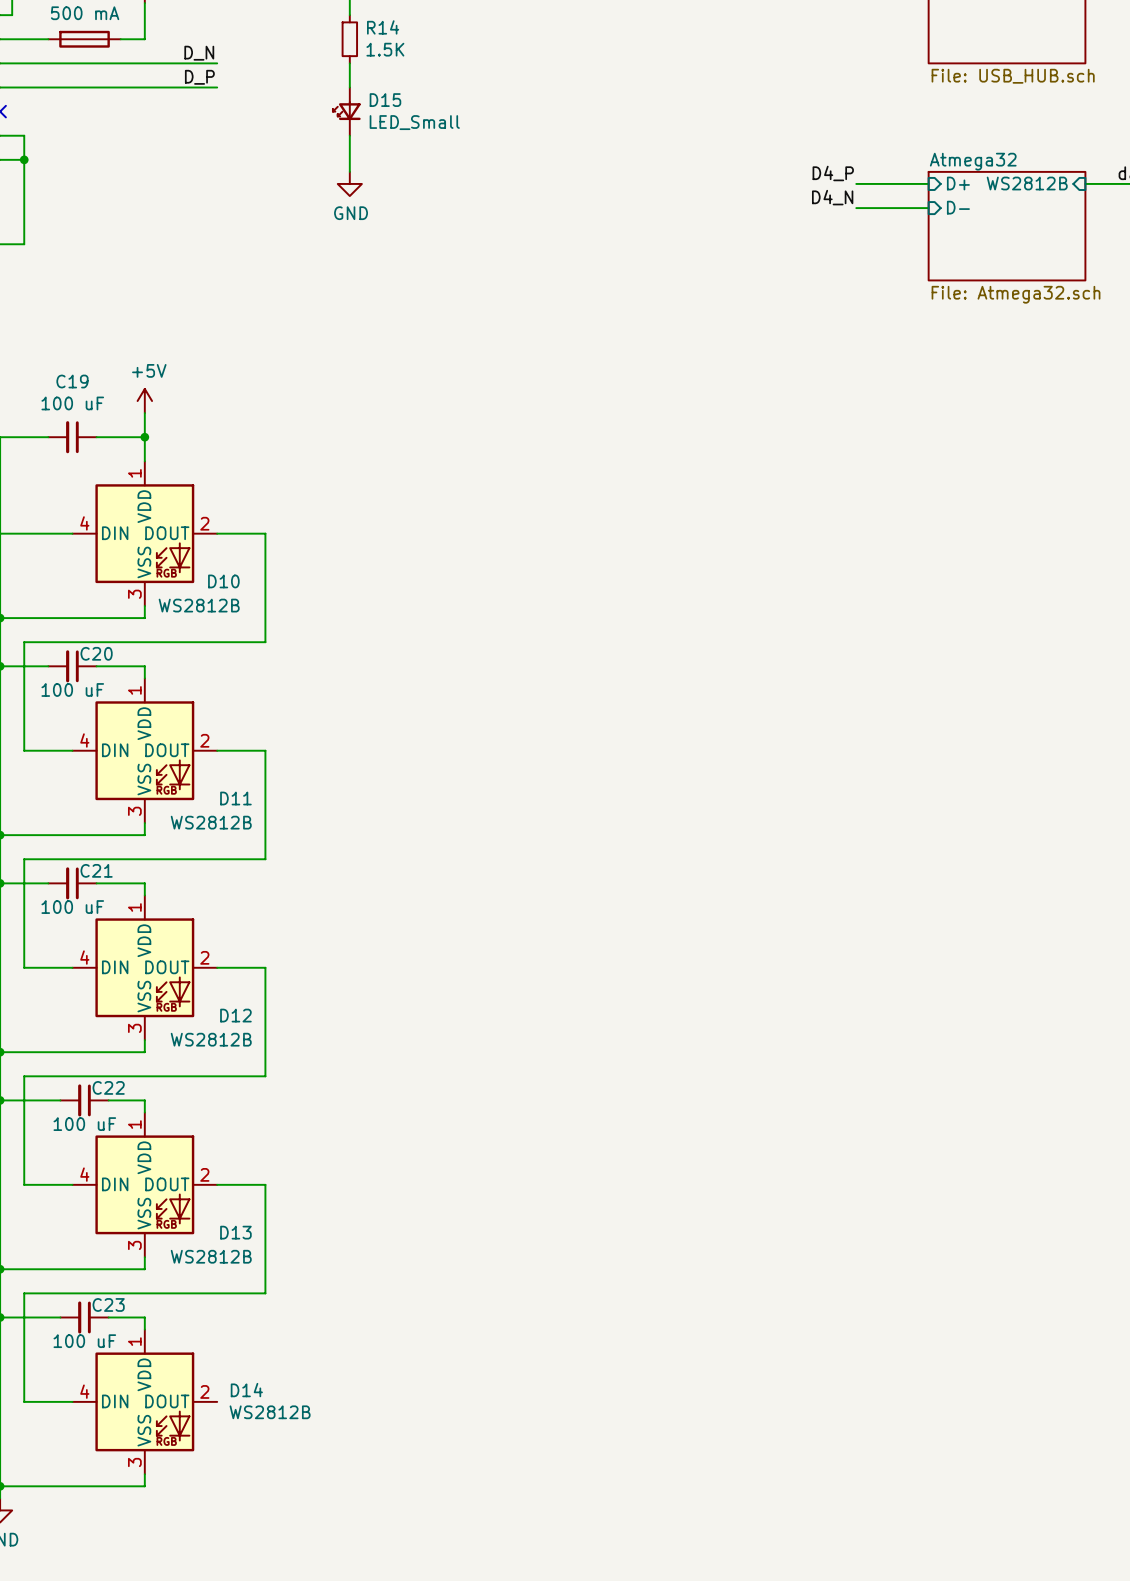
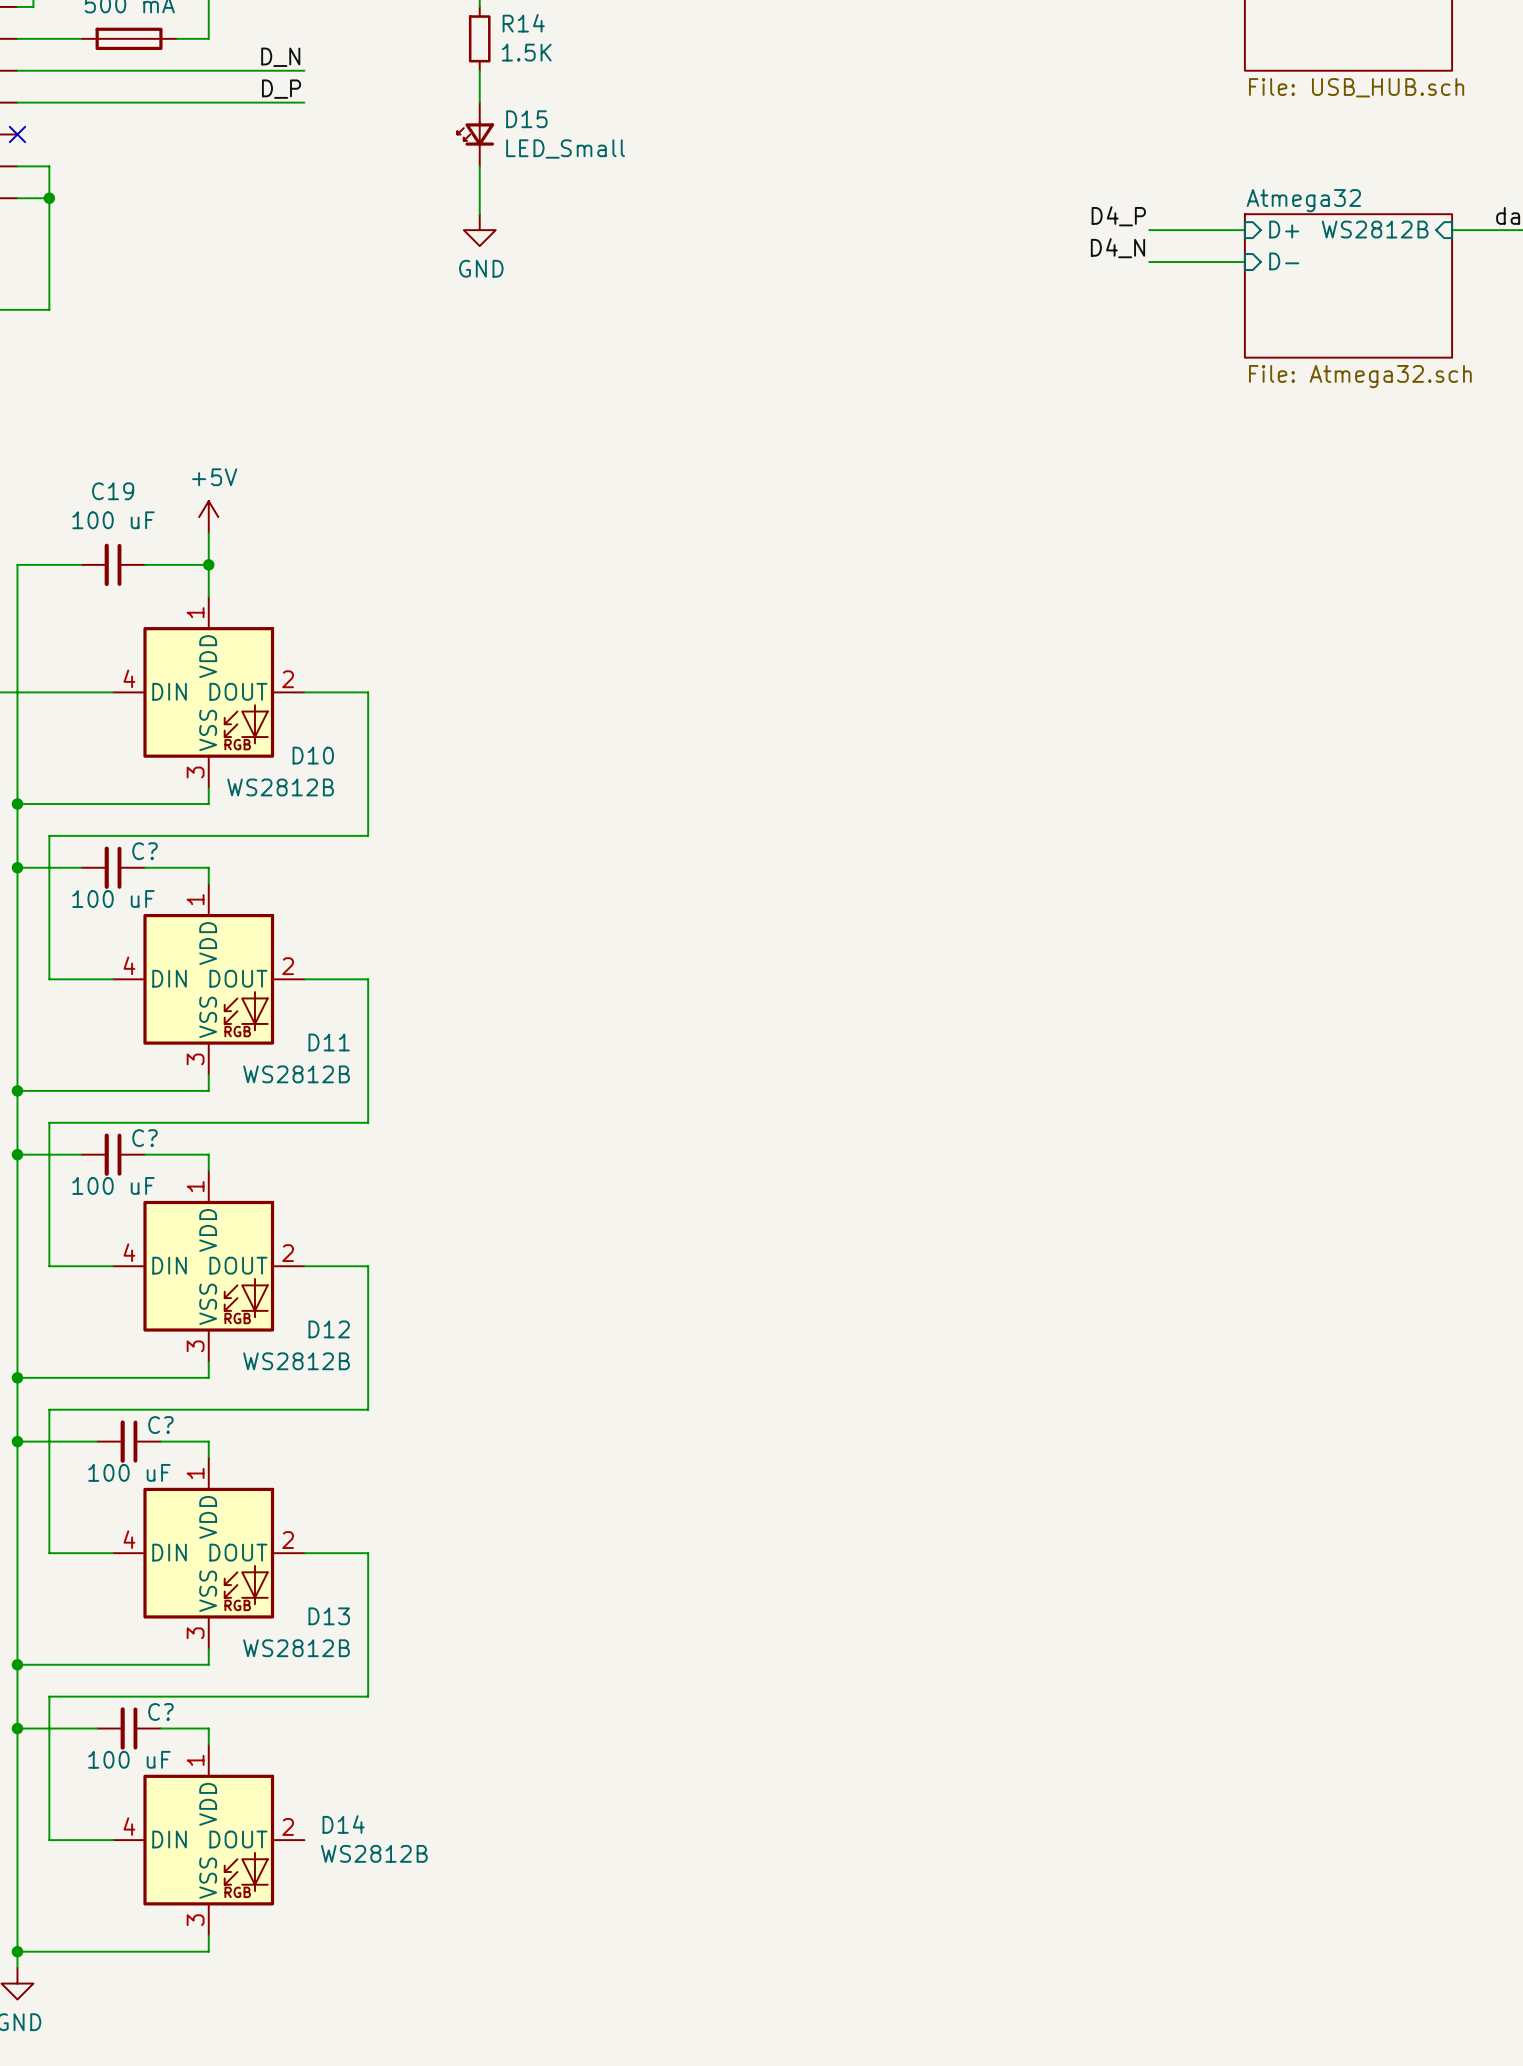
C20 name: C20 (96, 653) -> C? (144, 851)
C21 name: C21 (96, 870) -> C? (144, 1138)
C22 name: C22 (108, 1087) -> C? (160, 1425)
C23 name: C23 (108, 1304) -> C? (160, 1711)

